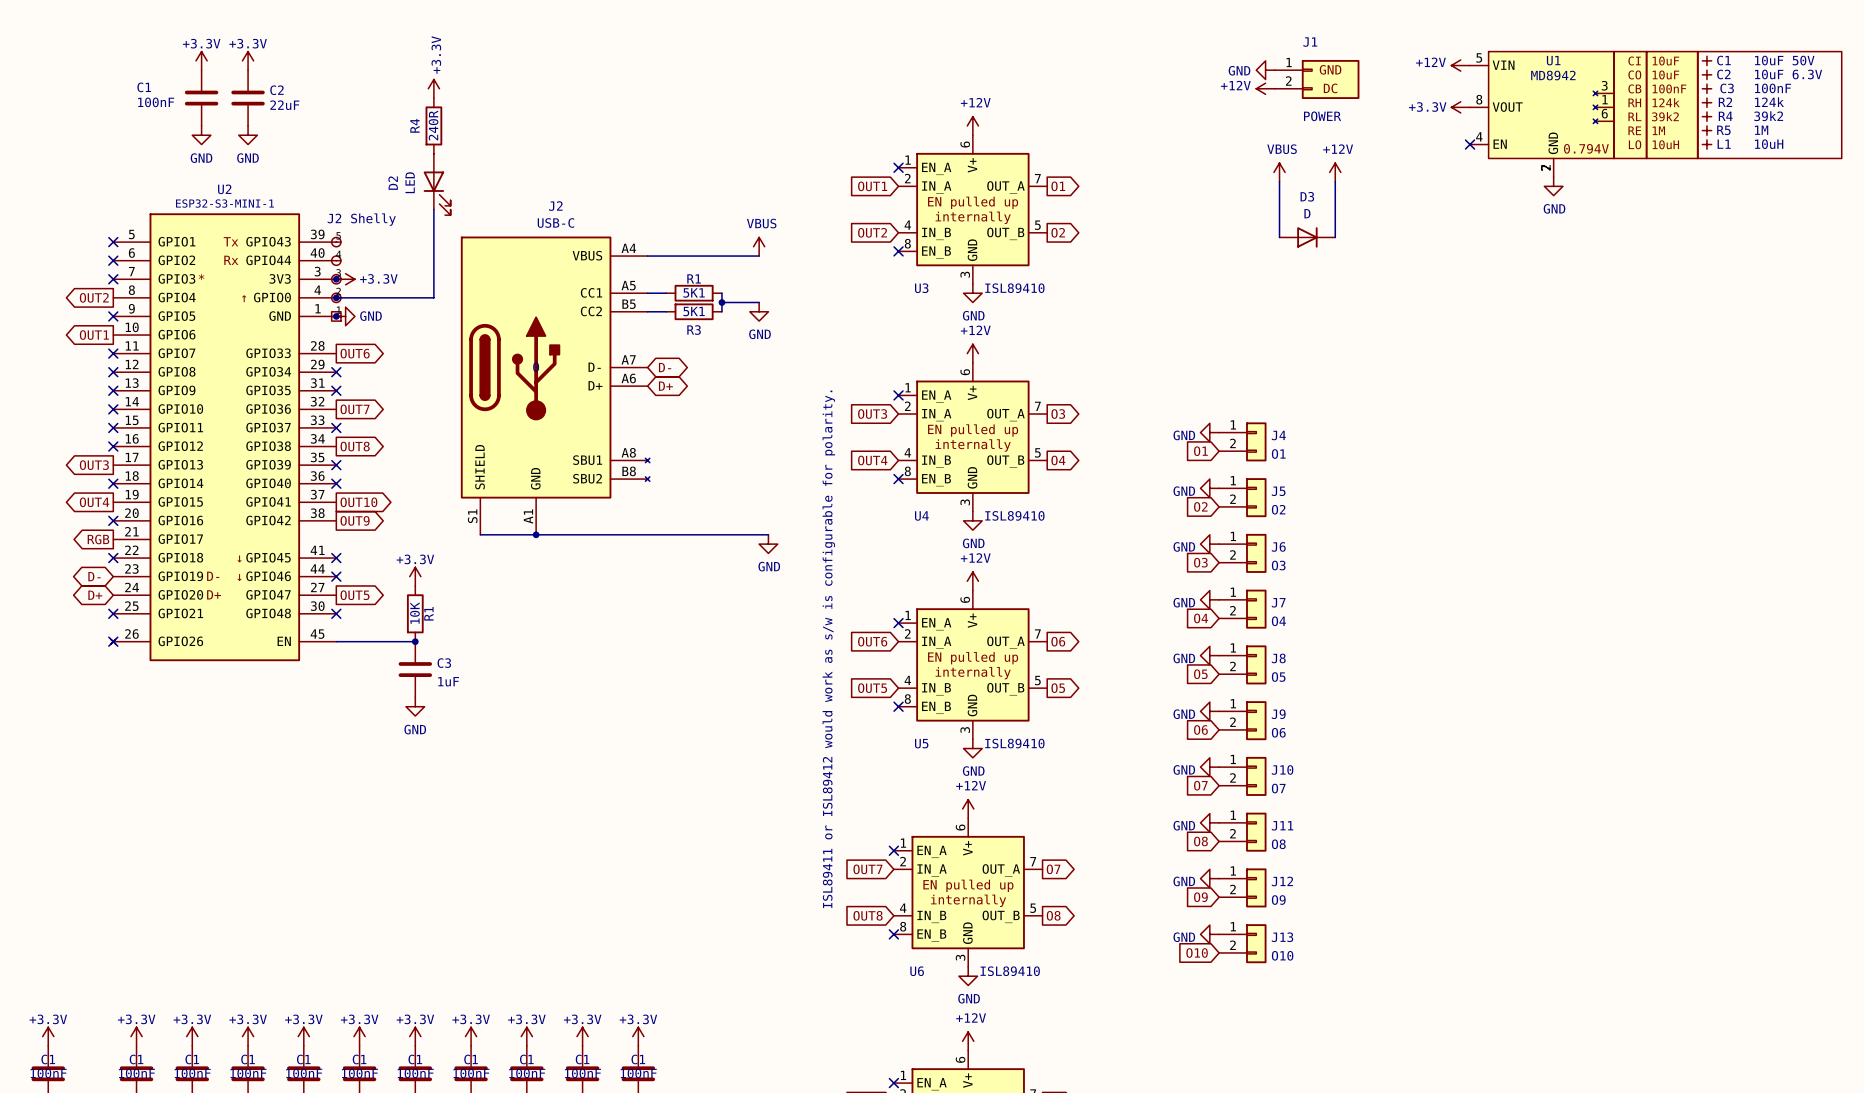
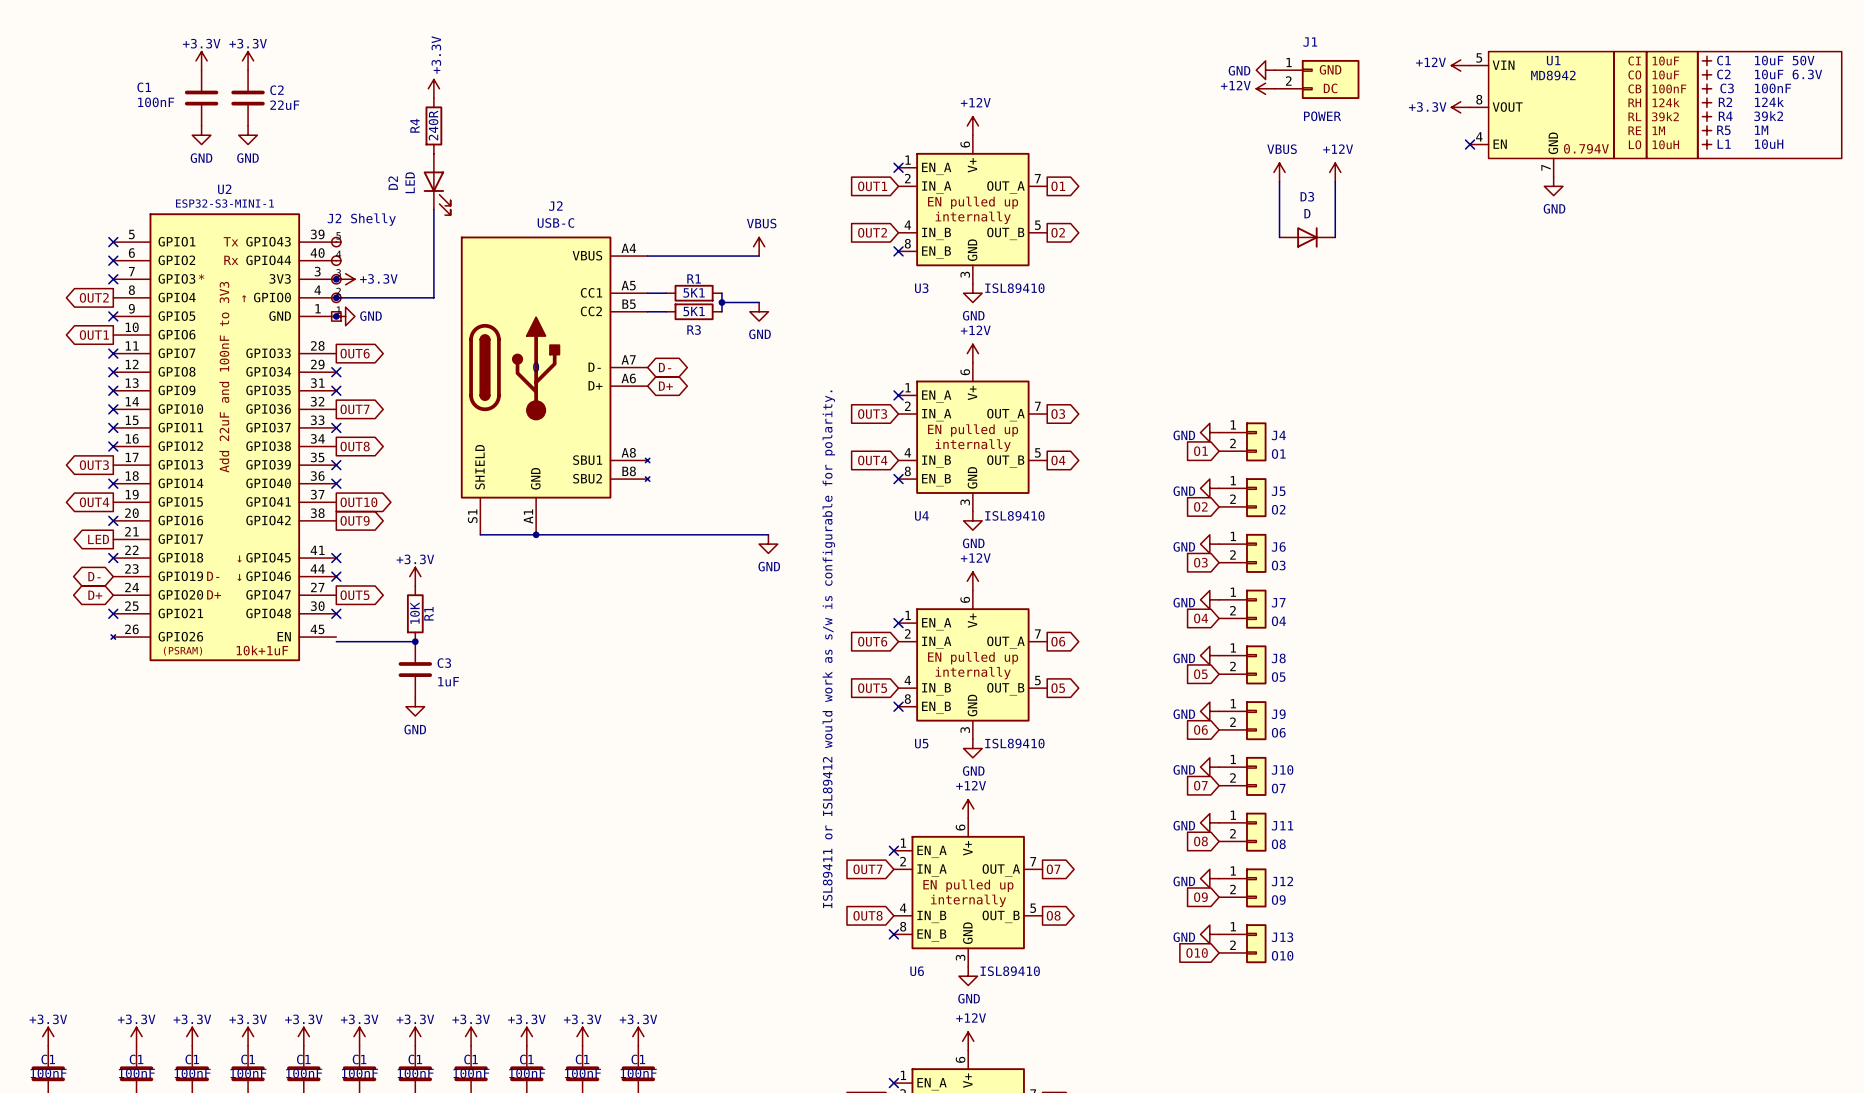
U1 symbol: [1470, 51, 1842, 178] -> [1470, 51, 1842, 178]
U2 symbol: [111, 213, 337, 662] -> [111, 213, 337, 662]
global label: RGB (98, 539) -> LED (98, 539)
no-connect mark: (113, 641) -> none

